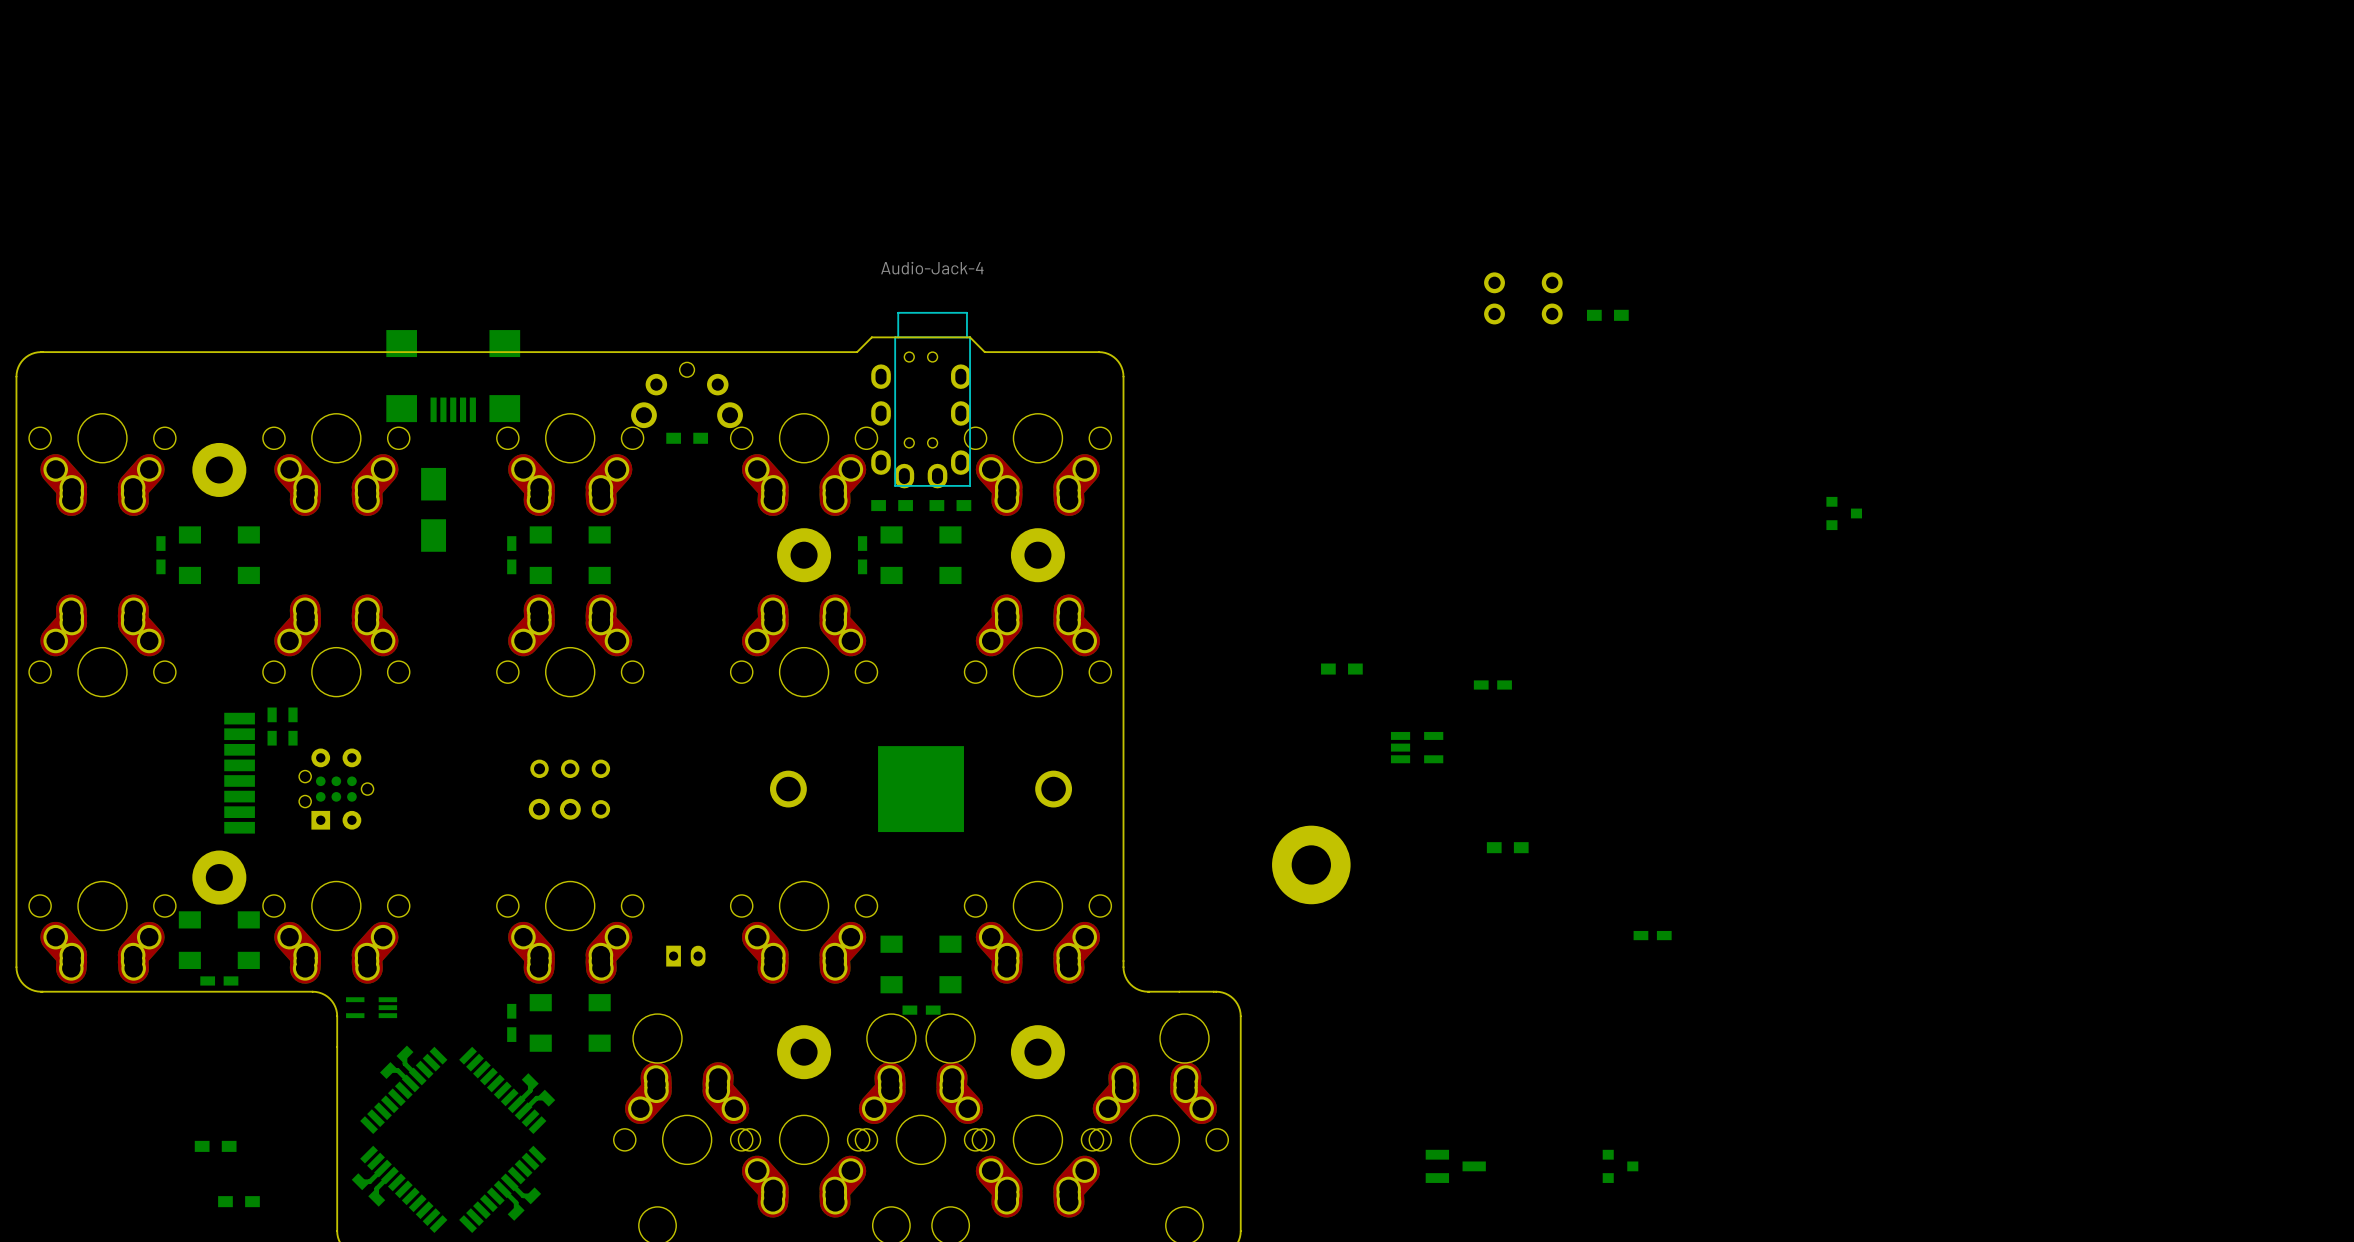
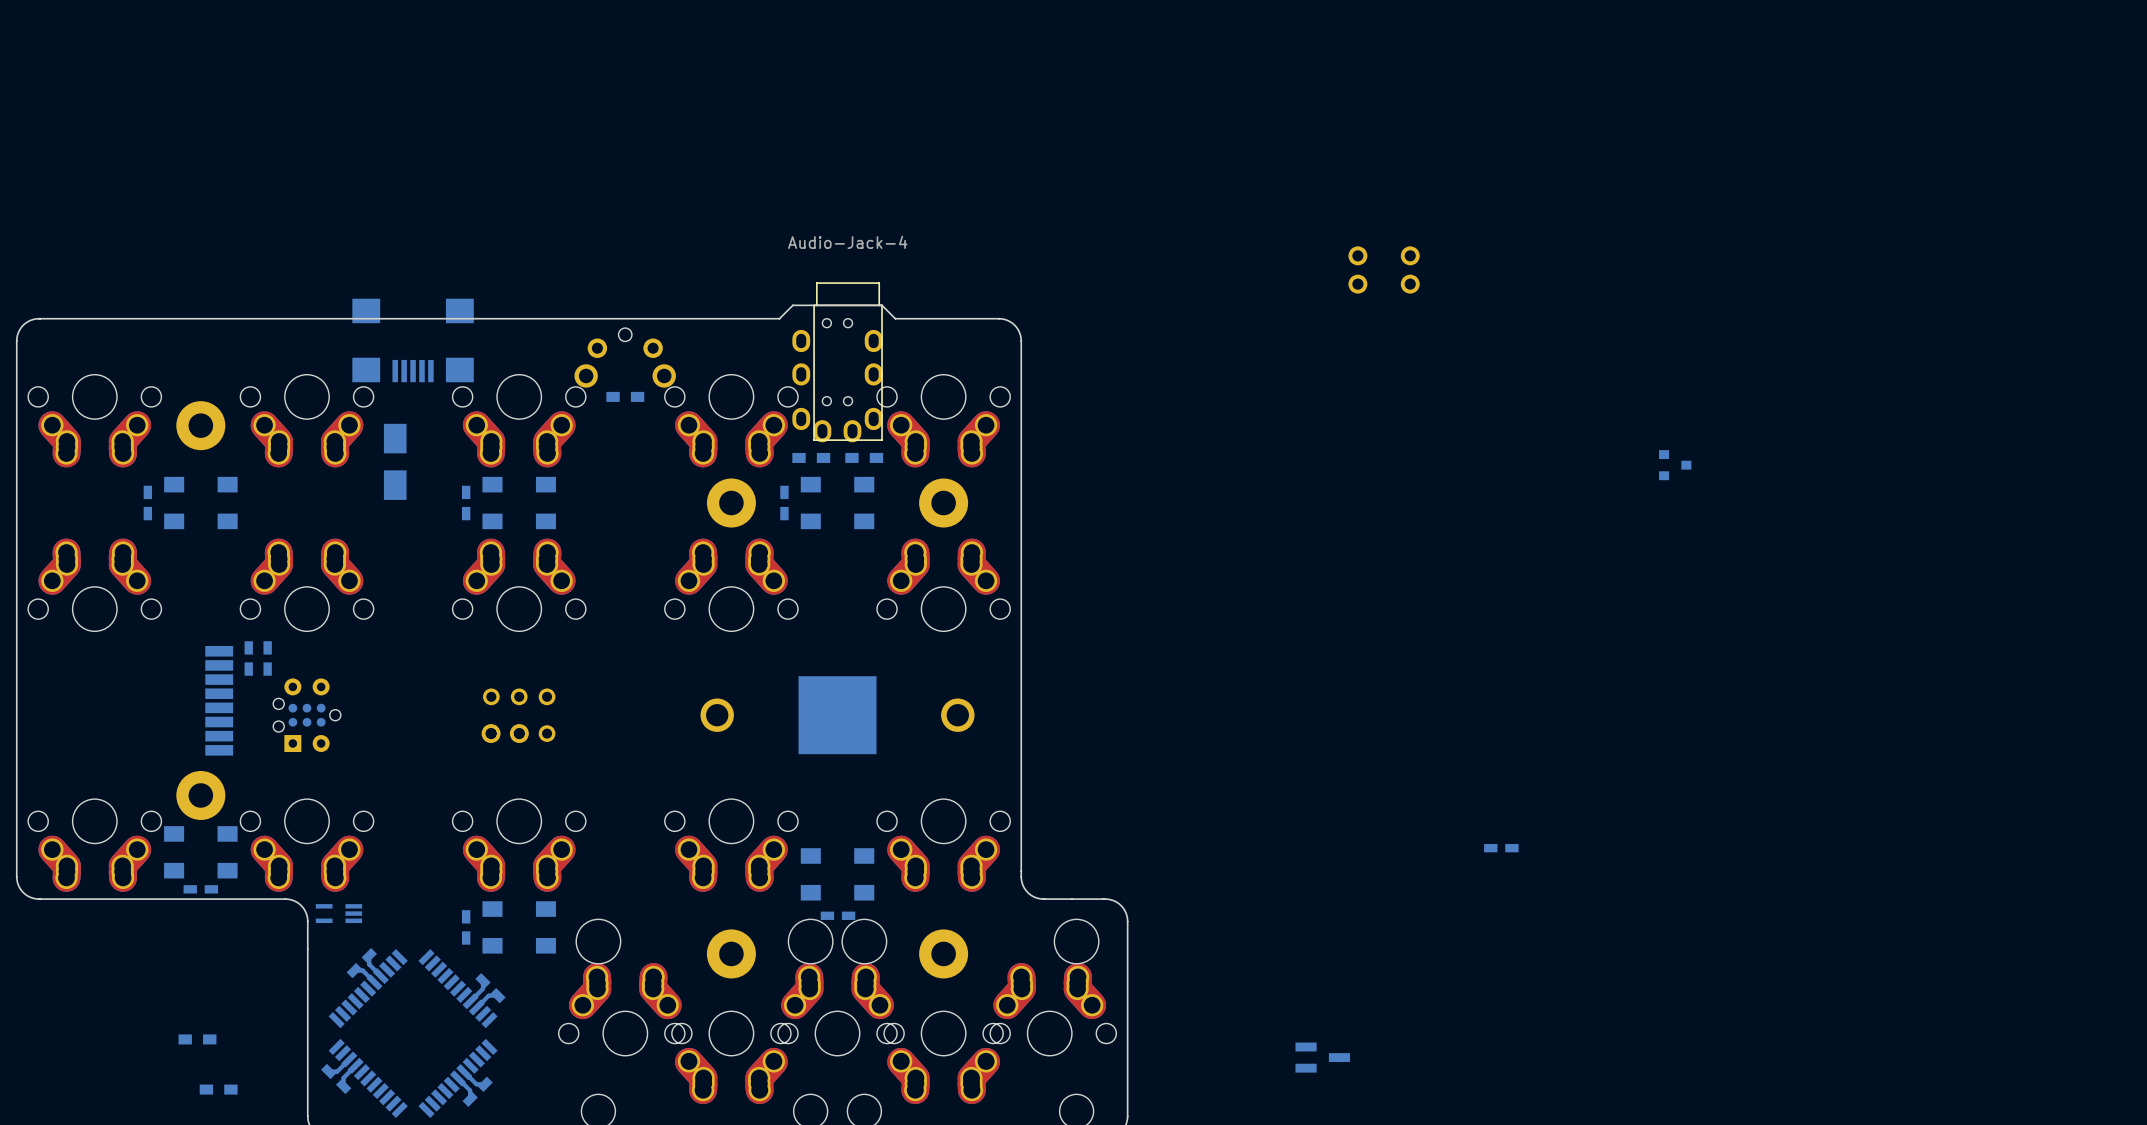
part: (1607, 315) -> none
part: (1341, 669) -> none
part: (1492, 684) -> none
part: (1417, 747) -> none
part: (1507, 847) -> none
part: (1311, 864) -> none
part: (685, 956) -> none
part: (1620, 1166) -> none

